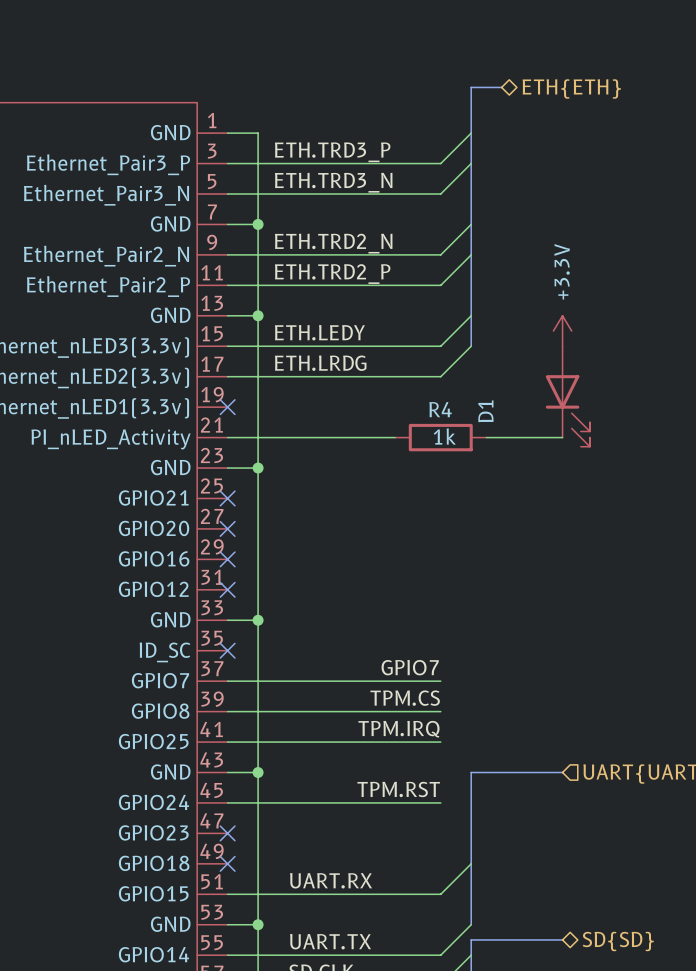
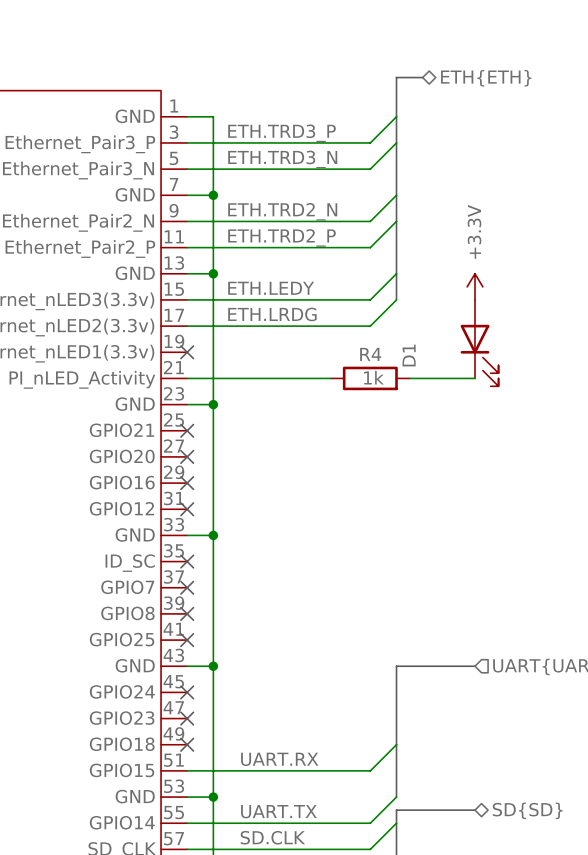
label: GPIO7 (410, 667) -> none
wire: (227, 681) (440, 681) -> none
no-connect mark: none -> (187, 587)
label: TPM.CS (405, 698) -> none
wire: (227, 711) (440, 711) -> none
no-connect mark: none -> (187, 613)
label: TPM.IRQ (398, 729) -> none
wire: (227, 742) (440, 742) -> none
no-connect mark: none -> (187, 640)
label: TPM.RST (398, 789) -> none
wire: (227, 802) (440, 802) -> none
no-connect mark: none -> (187, 692)

